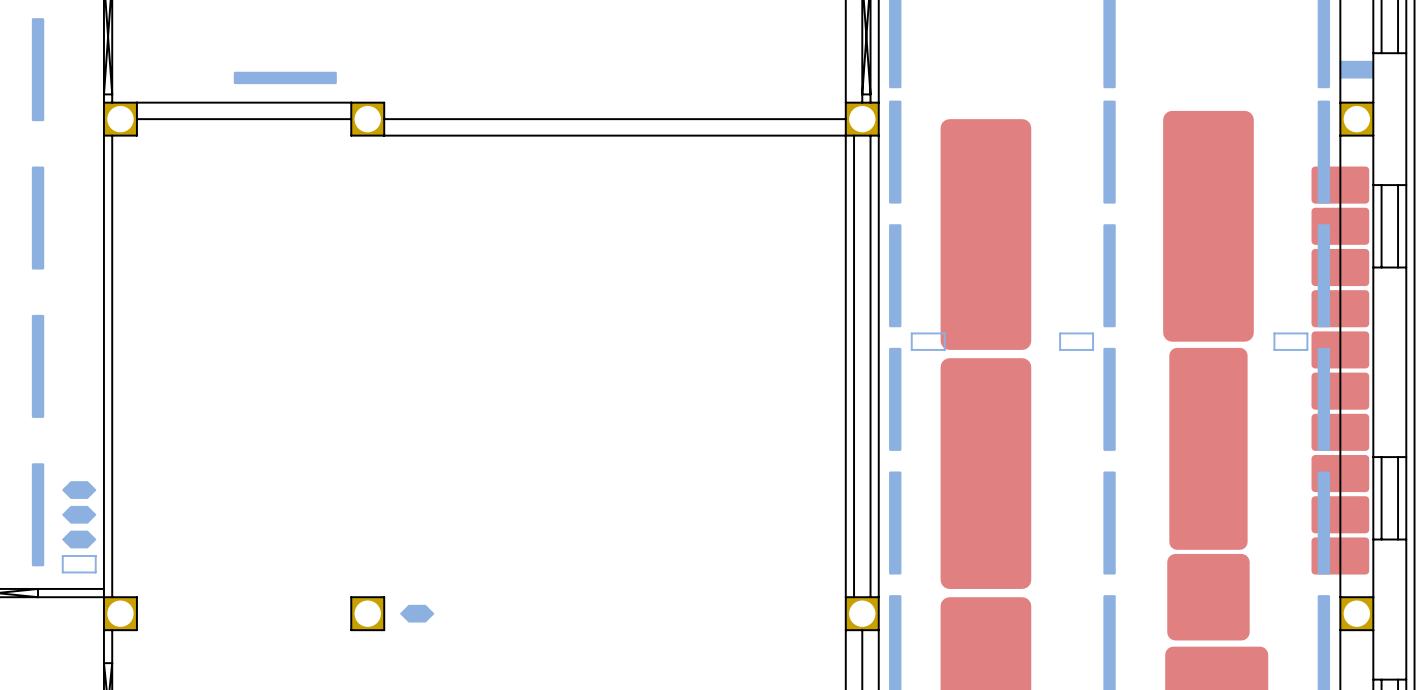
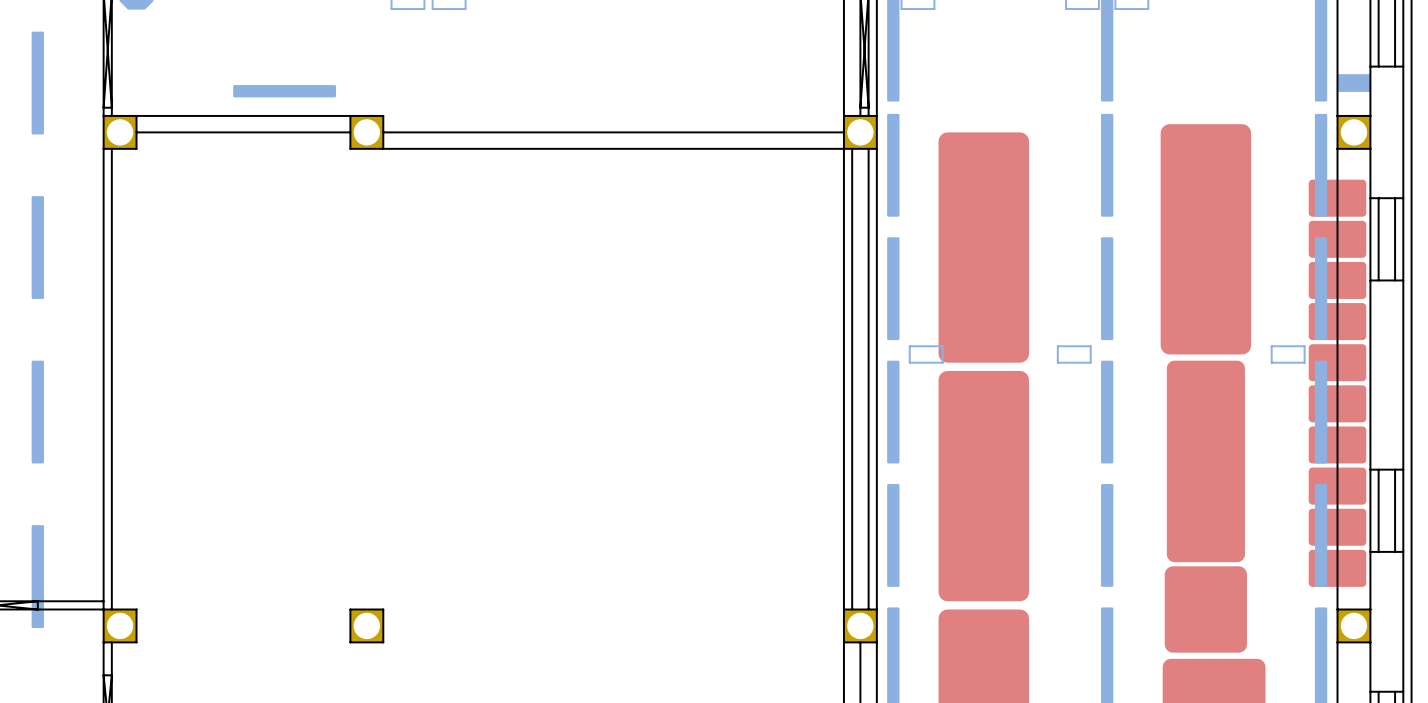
part position: (38, 218) -> (37, 247)
part position: (38, 366) -> (37, 412)
drawing: [62, 481, 97, 549] -> none
part position: (38, 514) -> (37, 576)
bottom track: (95, 555) (62, 555) (62, 572) (95, 572) (95, 555) -> none
drawing: [400, 604, 435, 623] -> none

